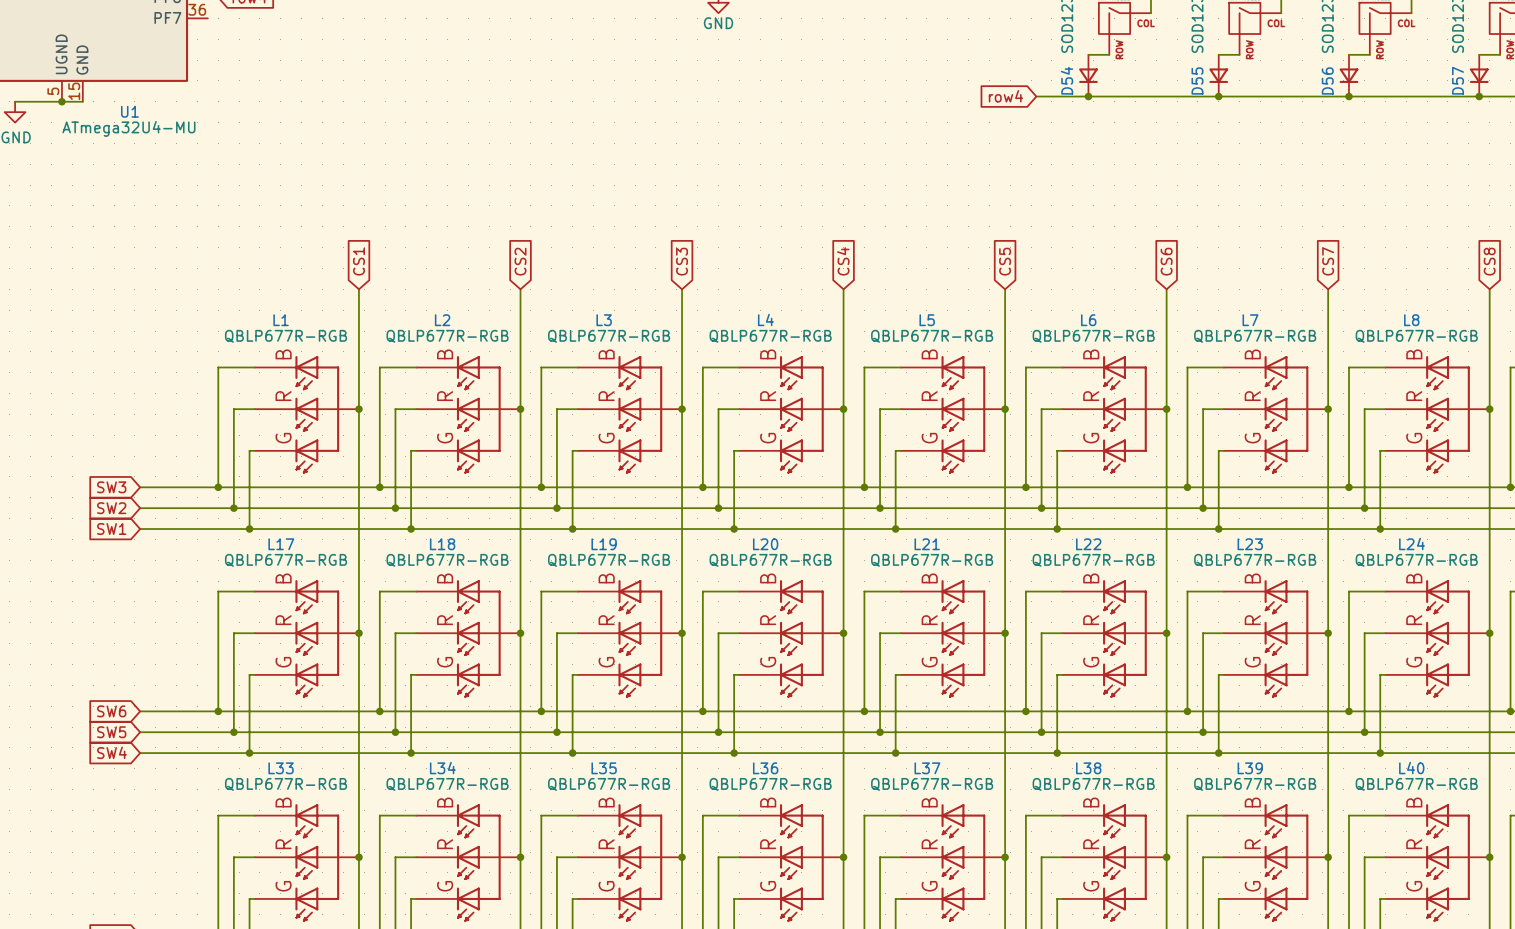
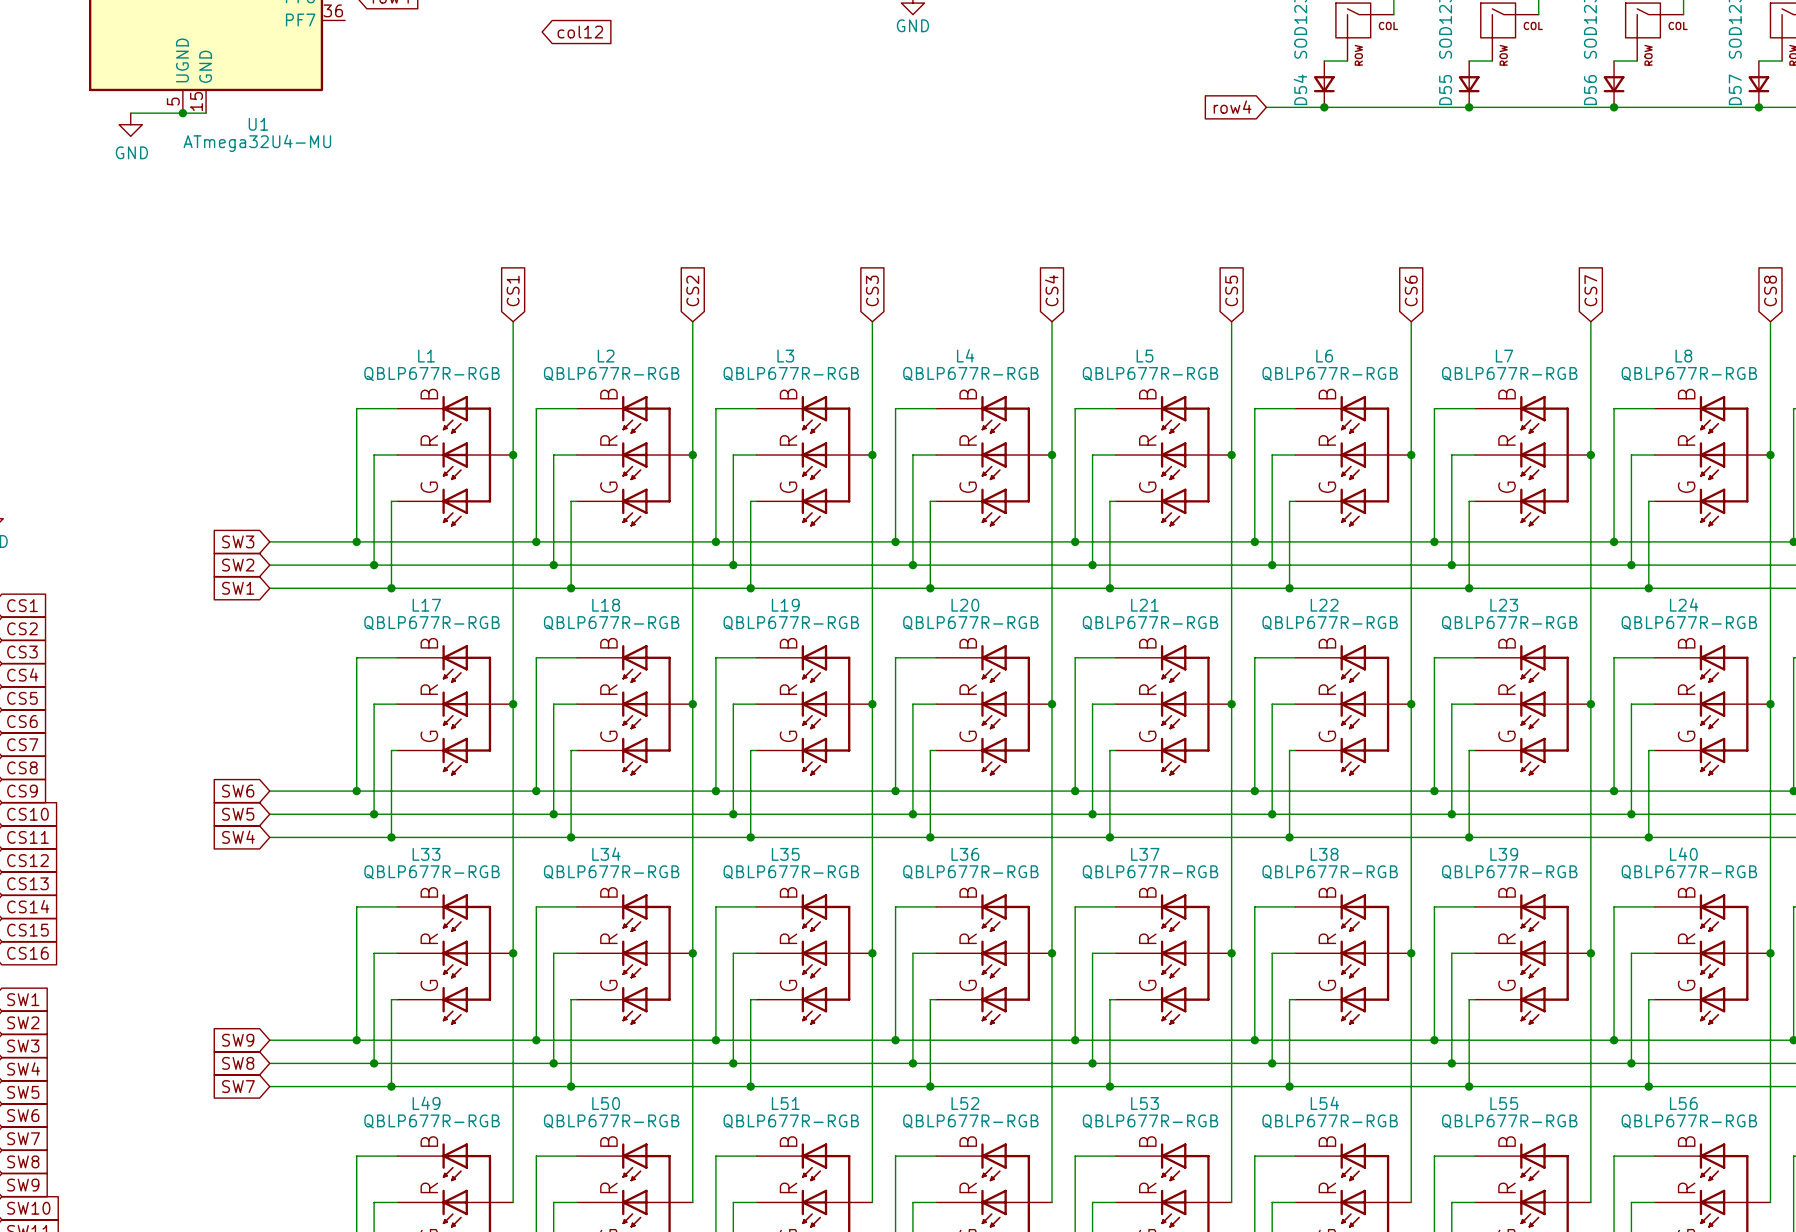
global label: none -> col12 (580, 32)

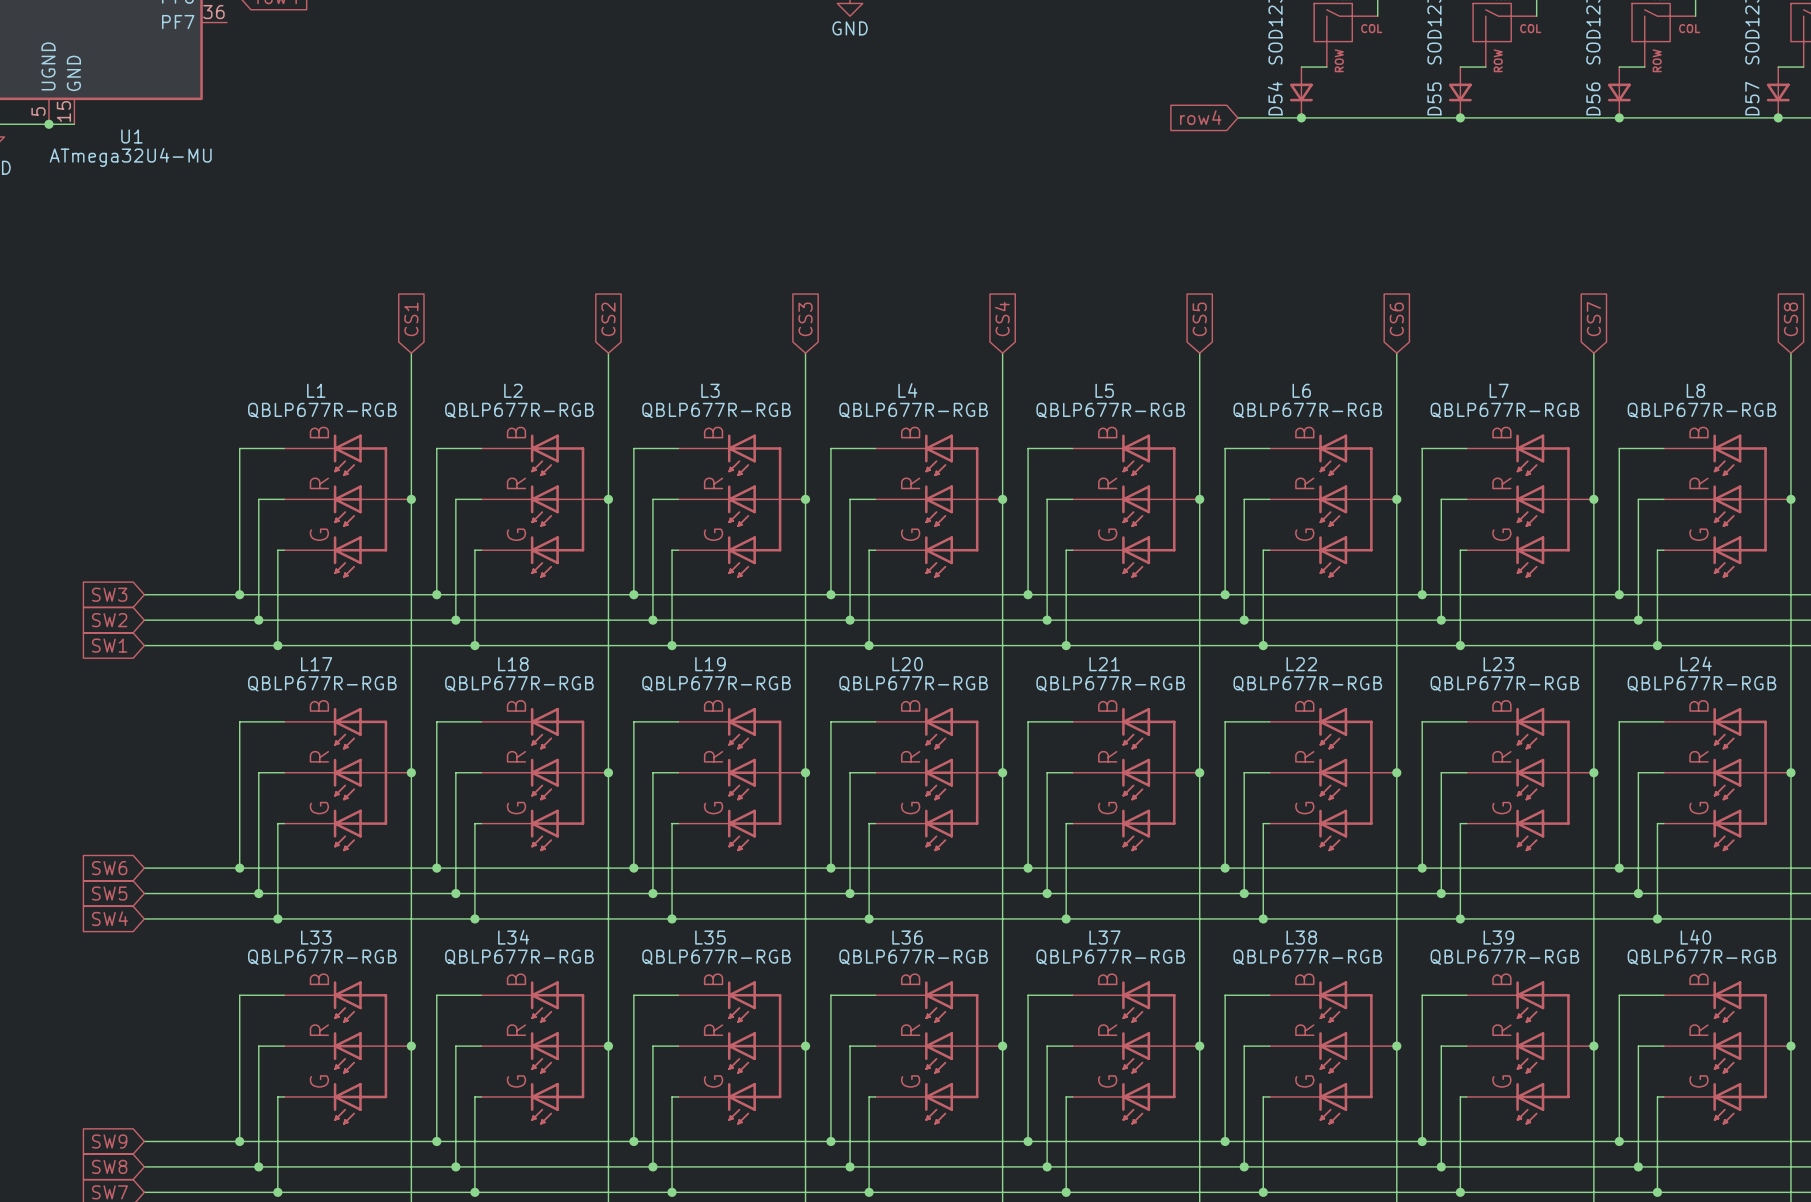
global label: col12 (580, 32) -> none

